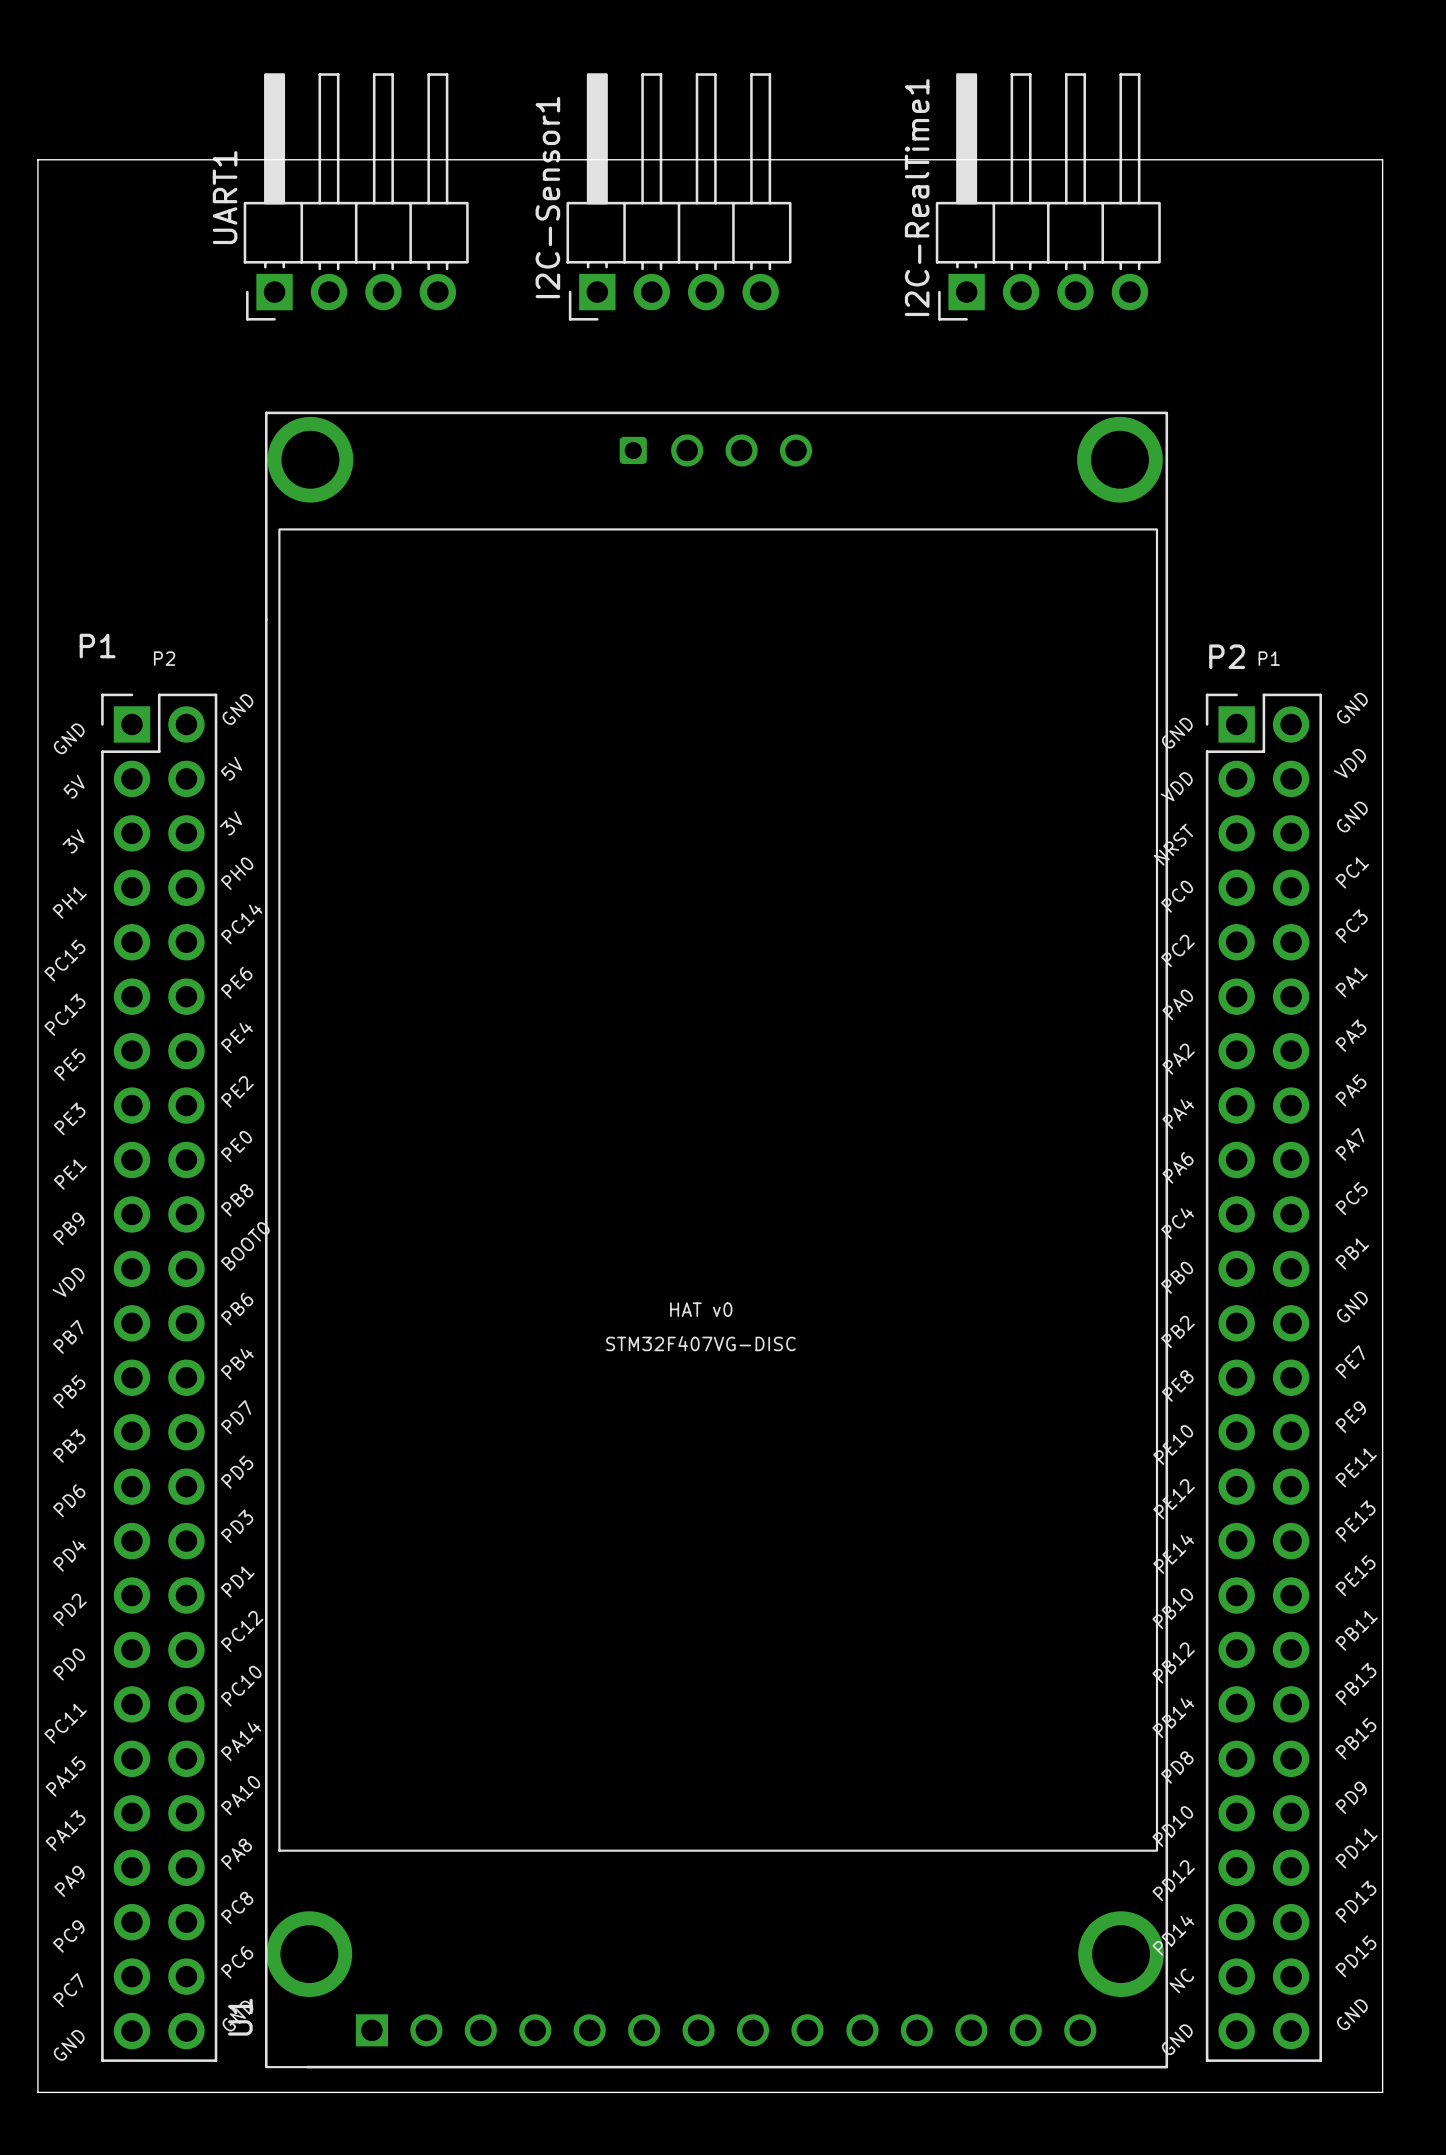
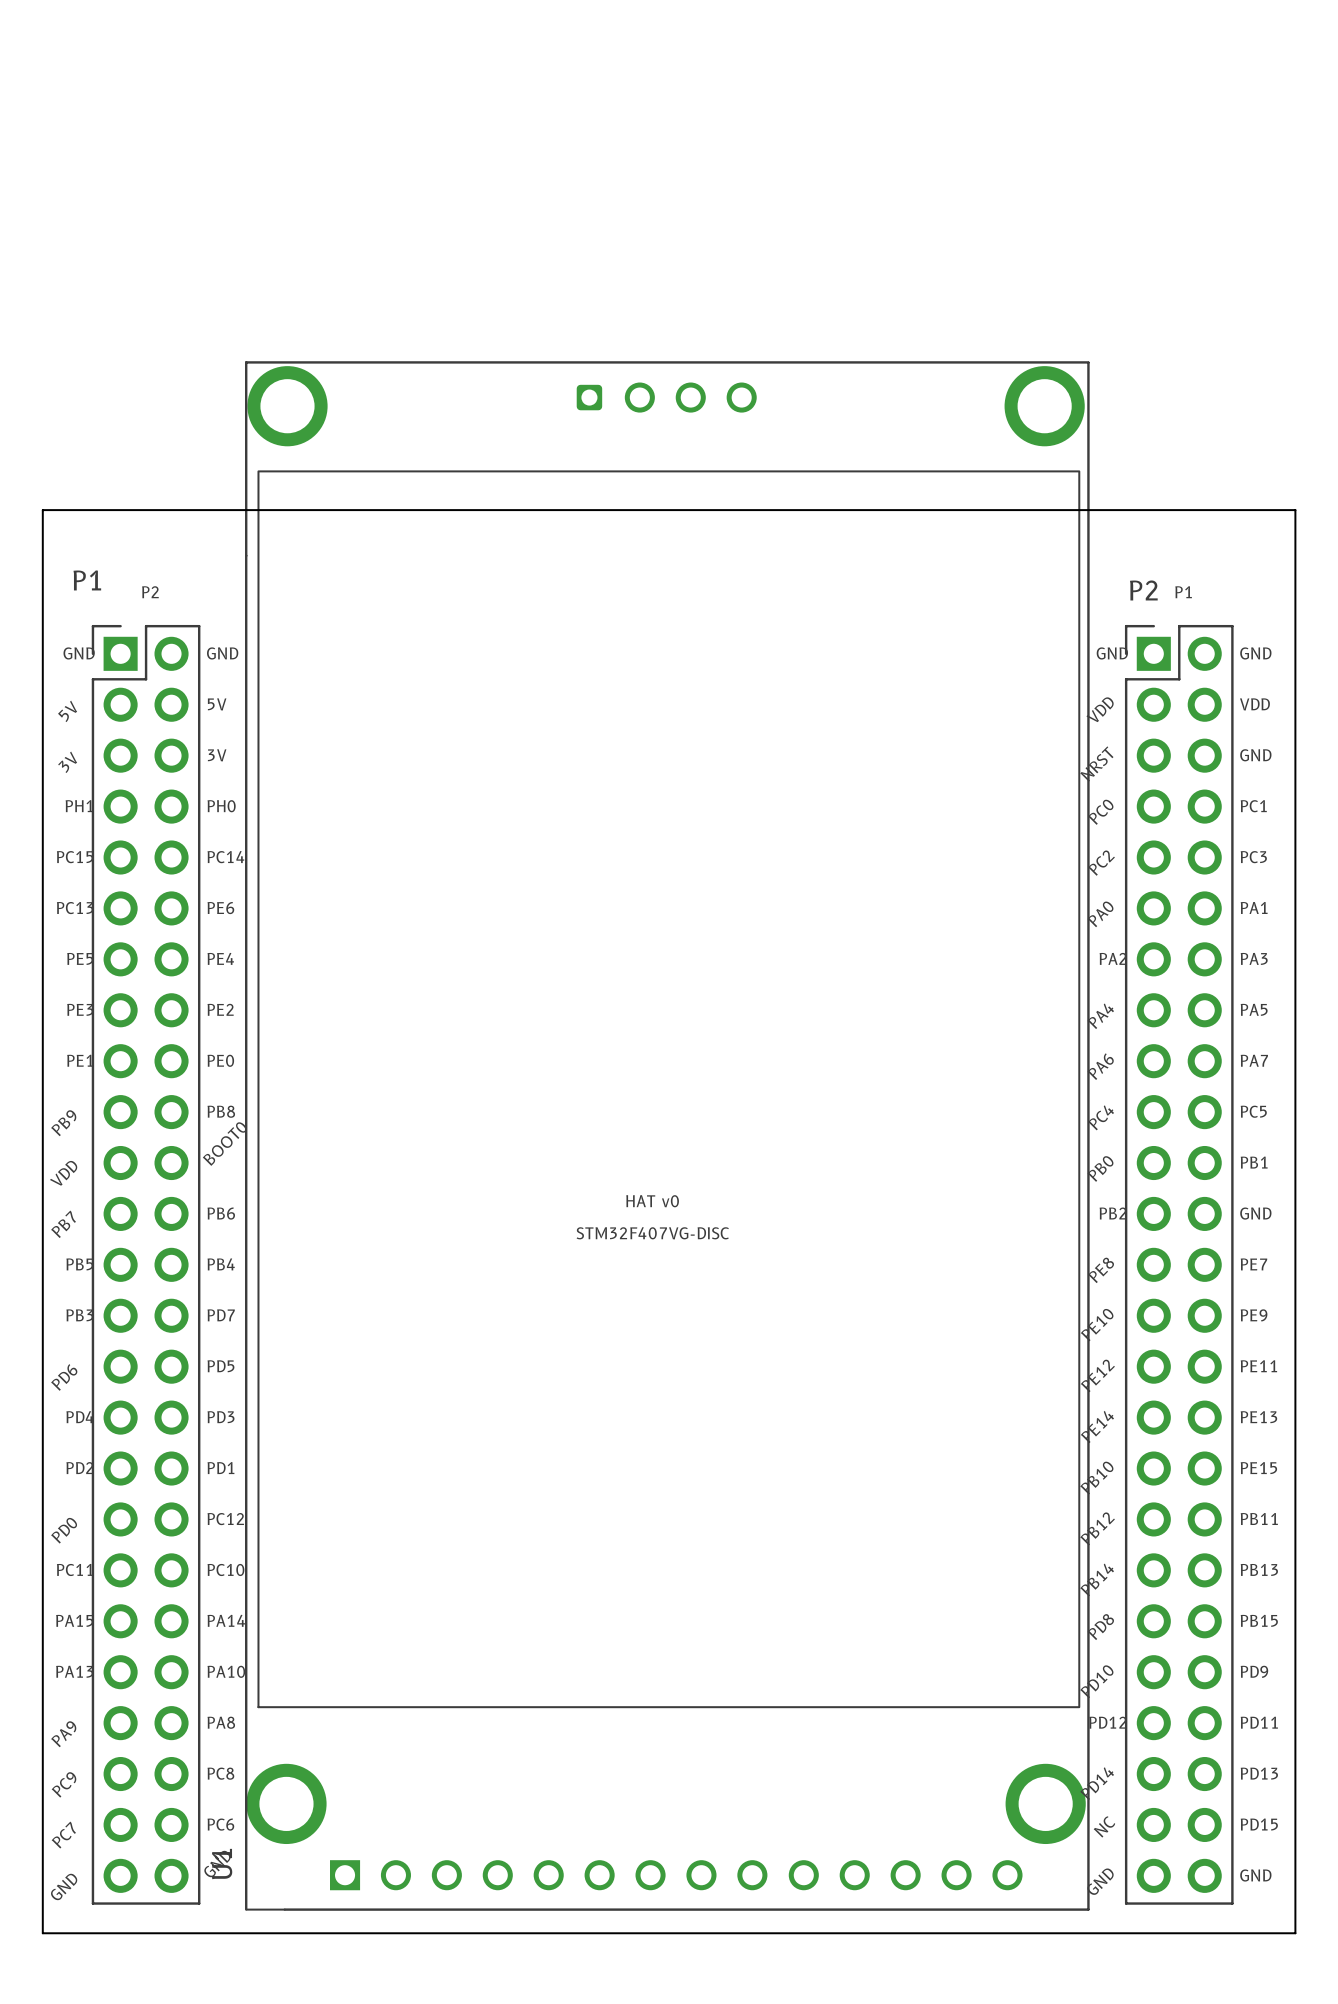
UART1: (356, 196) -> none
I2C-Sensor1: (678, 196) -> none
I2C-RealTime1: (1048, 196) -> none
text rotation: 0° (1352, 708) -> 45° clockwise (1255, 653)
text rotation: 0° (237, 709) -> 45° clockwise (222, 653)
text rotation: 0° (1177, 733) -> 45° clockwise (1112, 653)
text rotation: 0° (69, 738) -> 45° clockwise (79, 653)
text rotation: 0° (1350, 763) -> 45° clockwise (1254, 704)
text rotation: 0° (231, 768) -> 45° clockwise (217, 704)
text rotation: 0° (1352, 816) -> 45° clockwise (1255, 755)
text rotation: 0° (231, 823) -> 45° clockwise (217, 755)
text rotation: 0° (1352, 872) -> 45° clockwise (1253, 806)
text rotation: 0° (237, 873) -> 45° clockwise (221, 806)
text rotation: 0° (69, 902) -> 45° clockwise (79, 806)
text rotation: 0° (241, 924) -> 45° clockwise (225, 857)
text rotation: 0° (1351, 926) -> 45° clockwise (1253, 857)
text rotation: 0° (64, 960) -> 45° clockwise (75, 857)
text rotation: 0° (236, 982) -> 45° clockwise (220, 908)
text rotation: 0° (1351, 982) -> 45° clockwise (1254, 907)
text rotation: 0° (64, 1014) -> 45° clockwise (75, 908)
text rotation: 0° (1350, 1035) -> 45° clockwise (1254, 958)
text rotation: 0° (236, 1038) -> 45° clockwise (220, 958)
text rotation: 0° (1178, 1059) -> 45° clockwise (1113, 958)
text rotation: 0° (69, 1064) -> 45° clockwise (80, 958)
text rotation: 0° (1350, 1090) -> 45° clockwise (1254, 1009)
text rotation: 0° (237, 1091) -> 45° clockwise (220, 1009)
text rotation: 0° (69, 1118) -> 45° clockwise (80, 1009)
text rotation: 0° (1349, 1144) -> 45° clockwise (1254, 1060)
text rotation: 0° (236, 1146) -> 45° clockwise (220, 1060)
text rotation: 0° (70, 1174) -> 45° clockwise (80, 1060)
text rotation: 0° (1351, 1198) -> 45° clockwise (1253, 1111)
text rotation: 0° (237, 1200) -> 45° clockwise (221, 1111)
text rotation: 0° (1352, 1254) -> 45° clockwise (1254, 1162)
text rotation: 0° (1352, 1306) -> 45° clockwise (1255, 1213)
text rotation: 0° (237, 1308) -> 45° clockwise (221, 1213)
text rotation: 0° (1177, 1331) -> 45° clockwise (1113, 1213)
text rotation: 0° (1350, 1361) -> 45° clockwise (1253, 1264)
text rotation: 0° (237, 1364) -> 45° clockwise (221, 1264)
text rotation: 0° (69, 1391) -> 45° clockwise (79, 1264)
text rotation: 0° (235, 1417) -> 45° clockwise (221, 1315)
text rotation: 0° (1350, 1417) -> 45° clockwise (1254, 1315)
text rotation: 0° (69, 1445) -> 45° clockwise (79, 1315)
text rotation: 0° (1356, 1467) -> 45° clockwise (1258, 1366)
text rotation: 0° (237, 1472) -> 45° clockwise (220, 1366)
text rotation: 0° (1355, 1521) -> 45° clockwise (1258, 1417)
text rotation: 0° (237, 1526) -> 45° clockwise (221, 1417)
text rotation: 0° (69, 1556) -> 45° clockwise (80, 1417)
text rotation: 0° (1355, 1575) -> 45° clockwise (1258, 1468)
text rotation: 0° (237, 1582) -> 45° clockwise (220, 1468)
text rotation: 0° (69, 1609) -> 45° clockwise (79, 1468)
text rotation: 0° (1356, 1630) -> 45° clockwise (1259, 1518)
text rotation: 0° (242, 1631) -> 45° clockwise (225, 1519)
text rotation: 0° (1355, 1683) -> 45° clockwise (1259, 1569)
text rotation: 0° (241, 1686) -> 45° clockwise (225, 1569)
text rotation: 0° (65, 1723) -> 45° clockwise (75, 1569)
text rotation: 0° (1355, 1738) -> 45° clockwise (1259, 1620)
text rotation: 0° (240, 1741) -> 45° clockwise (226, 1620)
text rotation: 0° (65, 1776) -> 45° clockwise (74, 1620)
text rotation: 0° (240, 1795) -> 45° clockwise (226, 1671)
text rotation: 0° (1351, 1797) -> 45° clockwise (1254, 1671)
text rotation: 0° (65, 1830) -> 45° clockwise (74, 1671)
text rotation: 0° (1356, 1848) -> 45° clockwise (1259, 1722)
text rotation: 0° (236, 1854) -> 45° clockwise (221, 1722)
text rotation: 0° (1173, 1880) -> 45° clockwise (1107, 1722)
text rotation: 0° (1355, 1901) -> 45° clockwise (1259, 1773)
text rotation: 0° (237, 1908) -> 45° clockwise (220, 1773)
text rotation: 0° (1355, 1956) -> 45° clockwise (1259, 1824)
text rotation: 0° (237, 1962) -> 45° clockwise (220, 1824)
text rotation: 0° (1352, 2014) -> 45° clockwise (1255, 1875)
board edge: (48, 2092) (37, 2092) (37, 159) (1382, 159) (1382, 2092) -> (42, 1933) (42, 510) (1295, 510) (1295, 1933) (1290, 1933)

